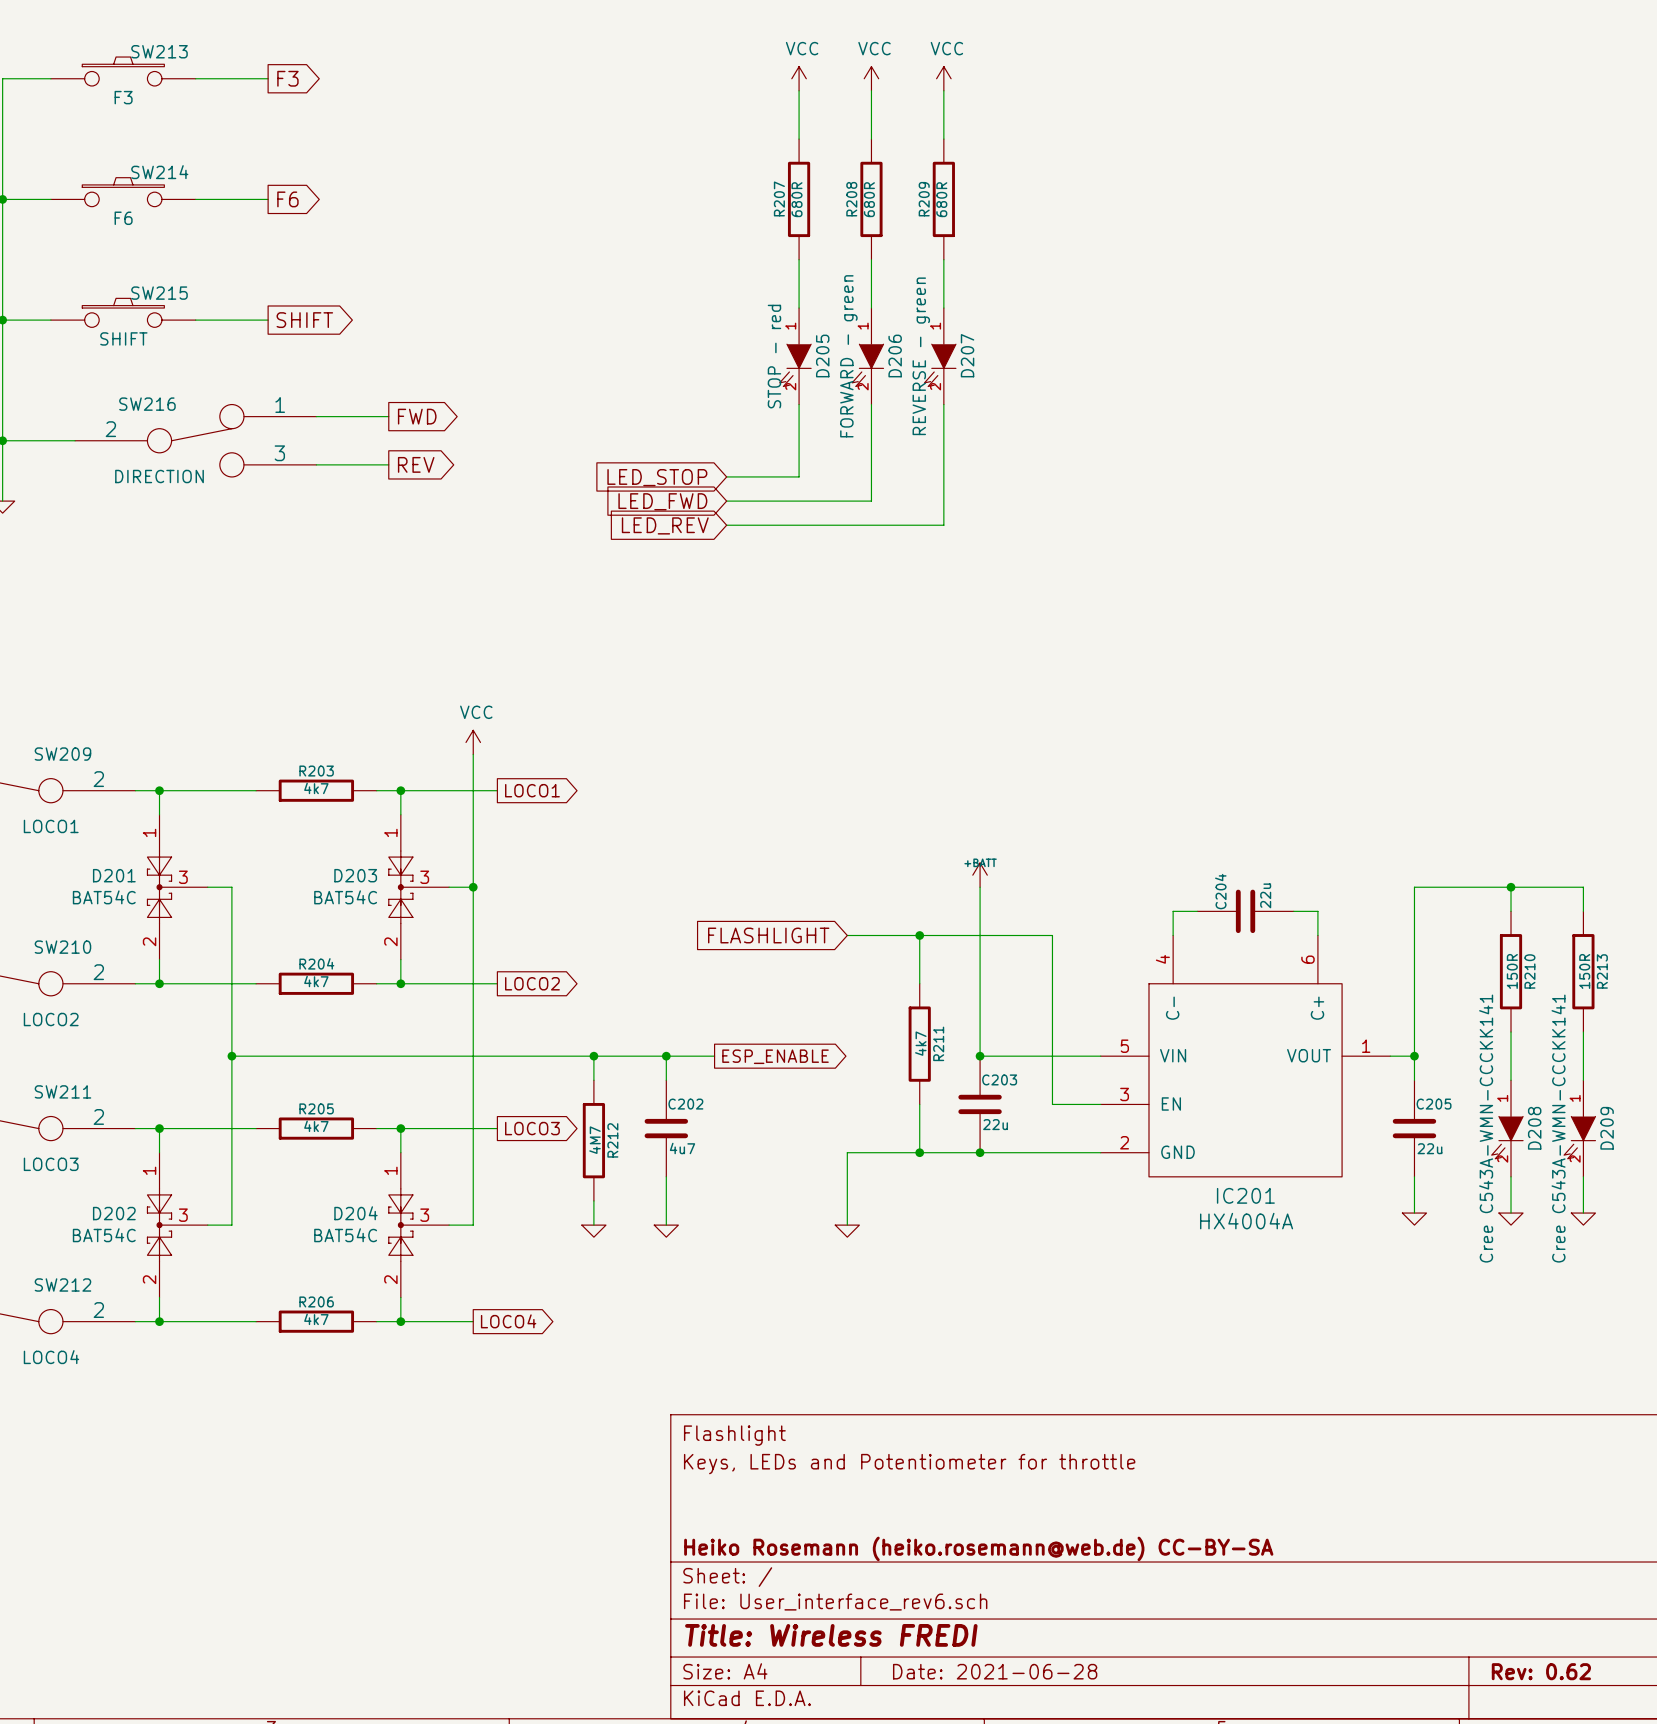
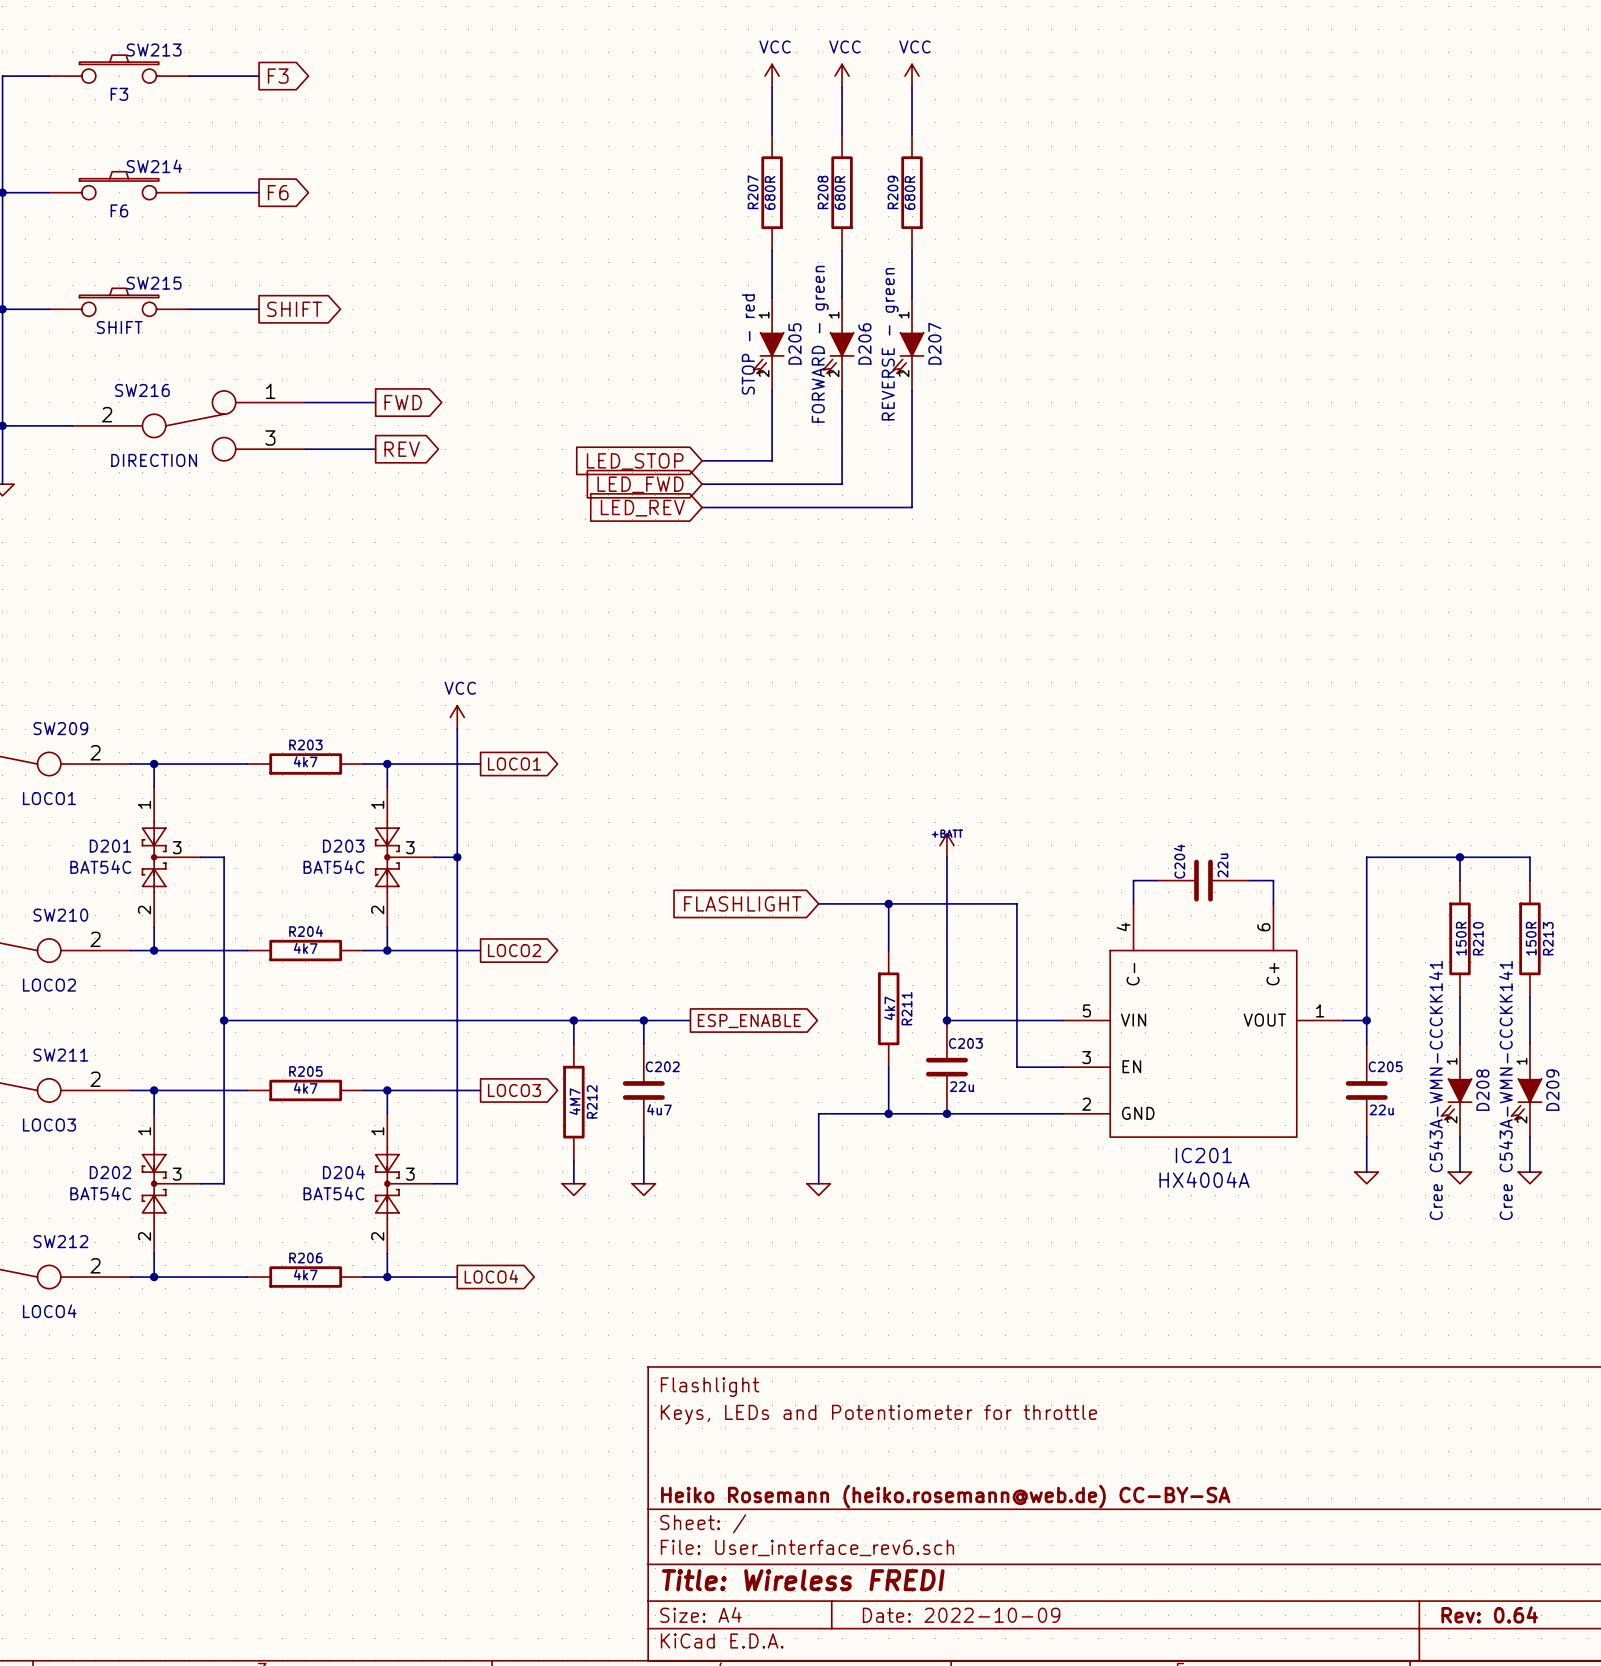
title block: Date: 2021-06-28 (995, 1671) -> Date: 2022-10-09 (961, 1615)
title block: Rev: 0.62 (1541, 1671) -> Rev: 0.64 (1489, 1614)

